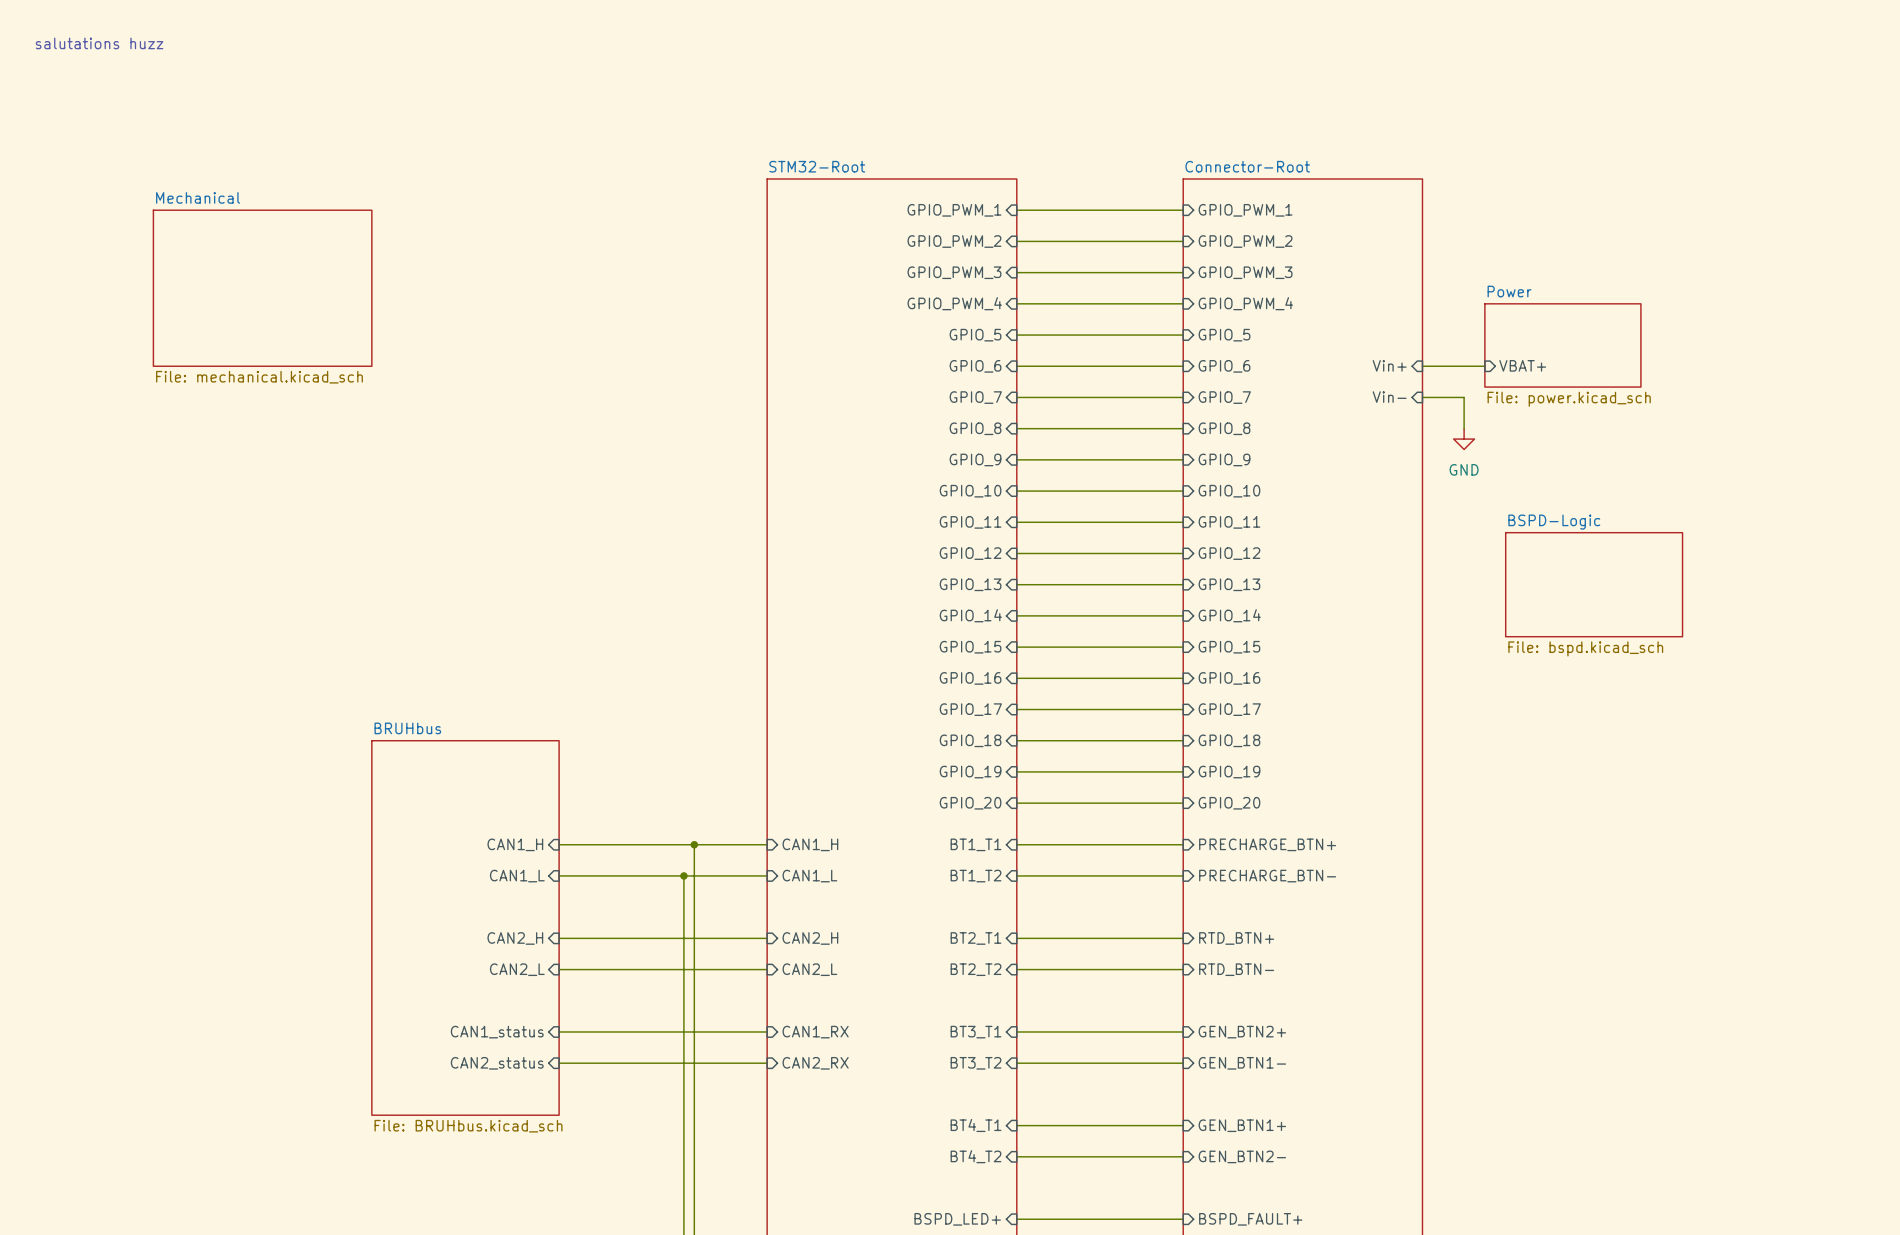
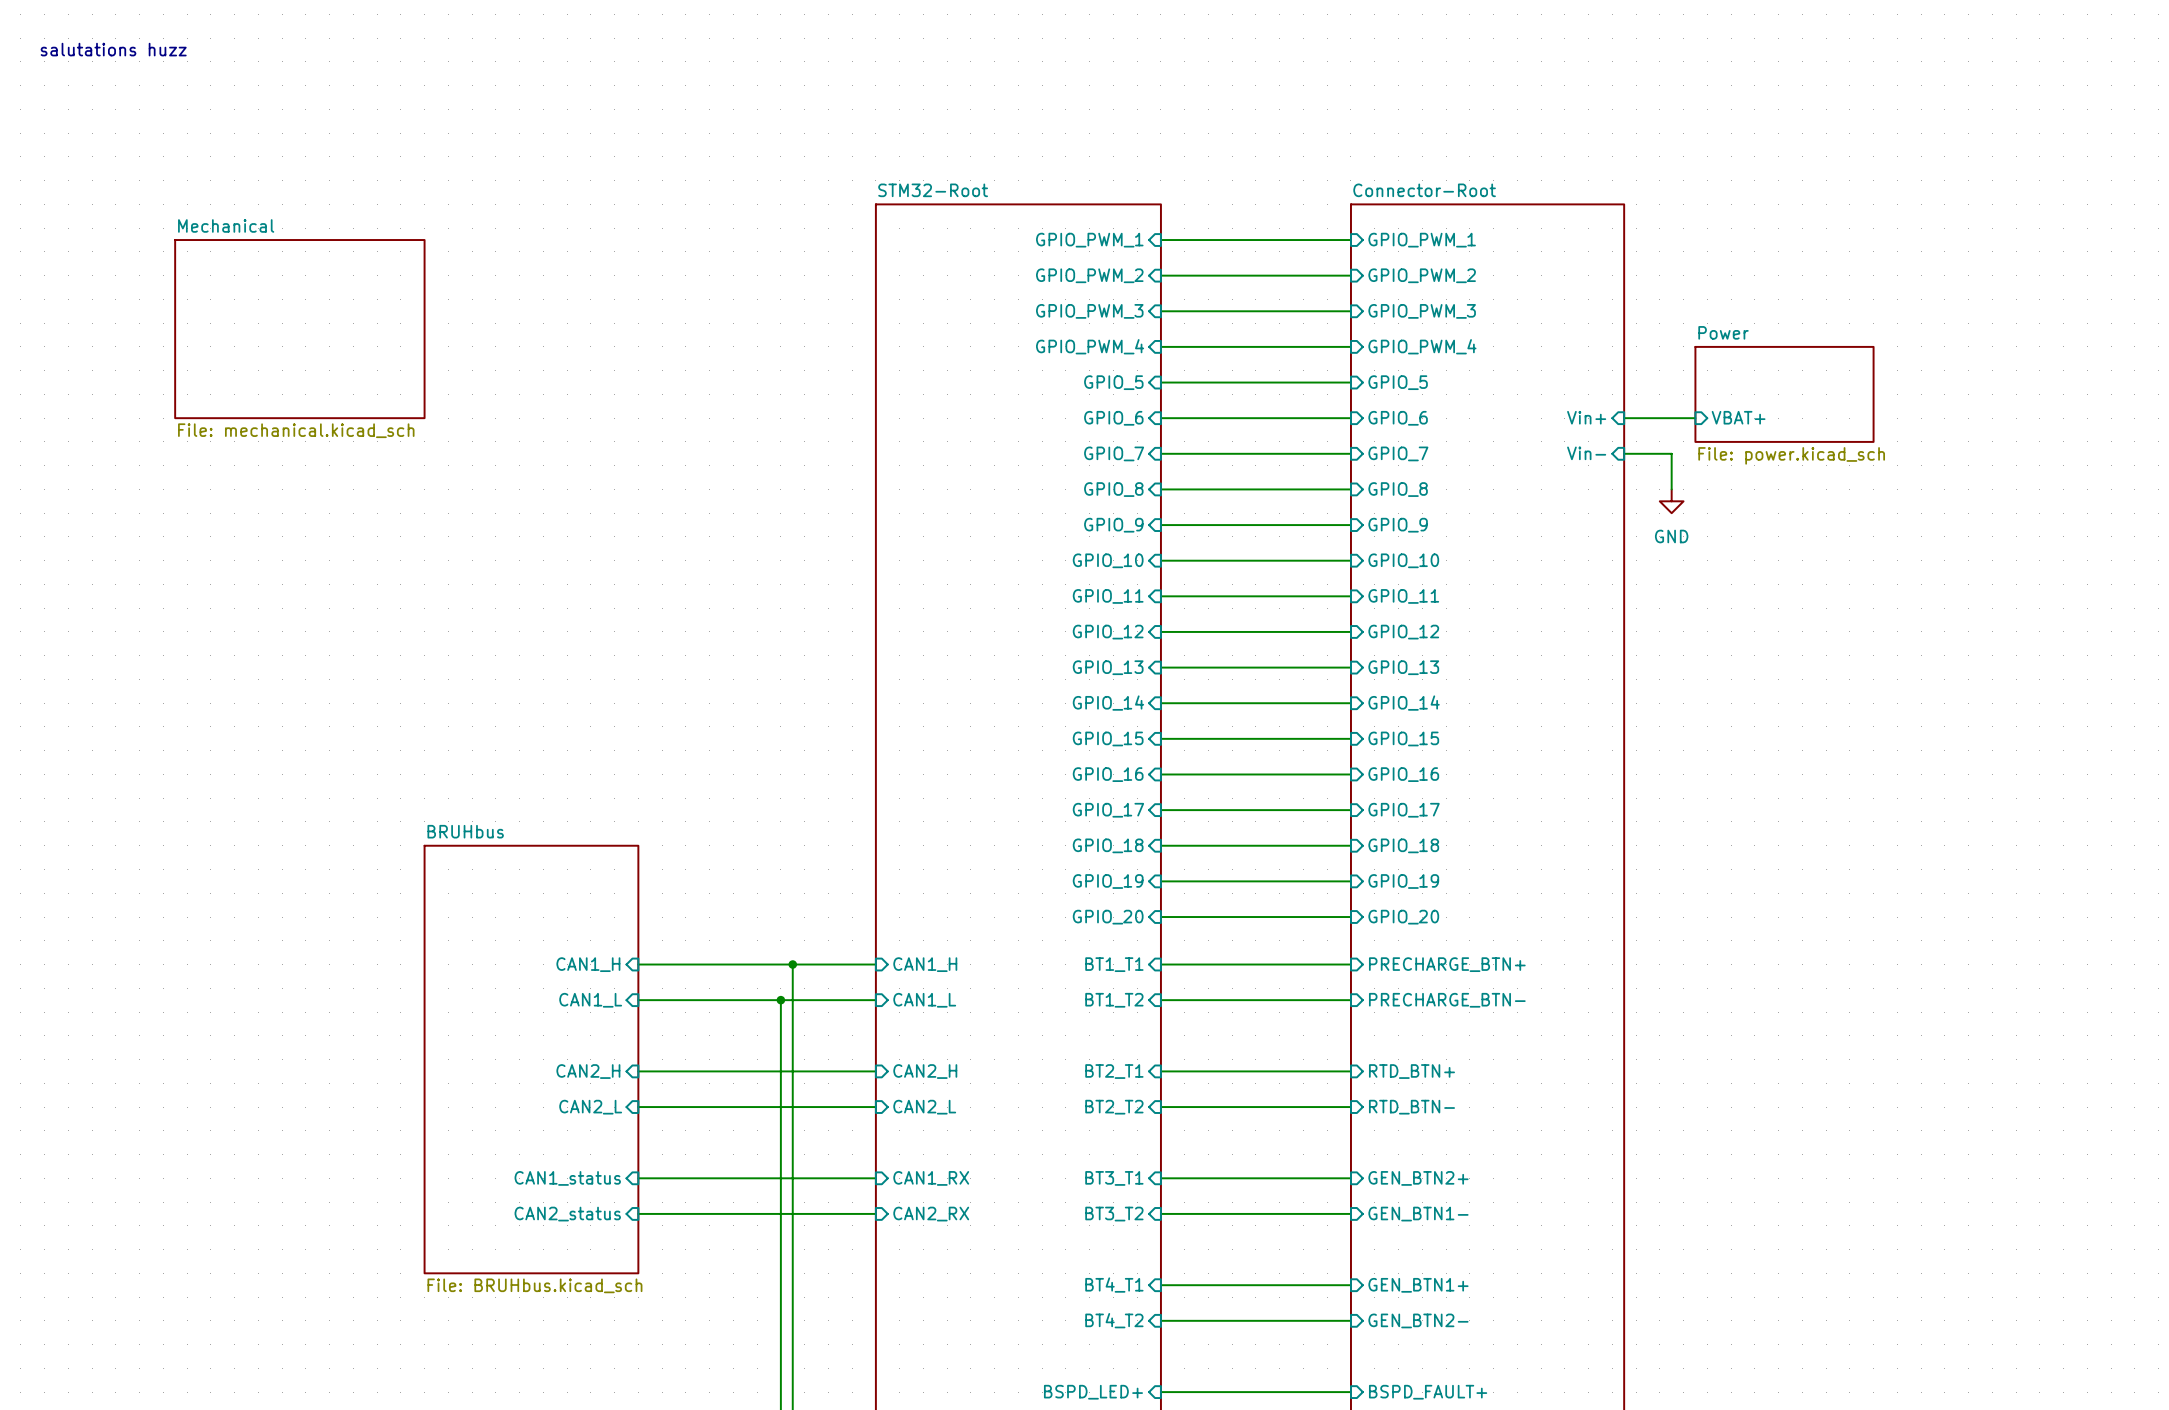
sheet BSPD-Logic: File: bspd.kicad_sch (1594, 584) -> none

